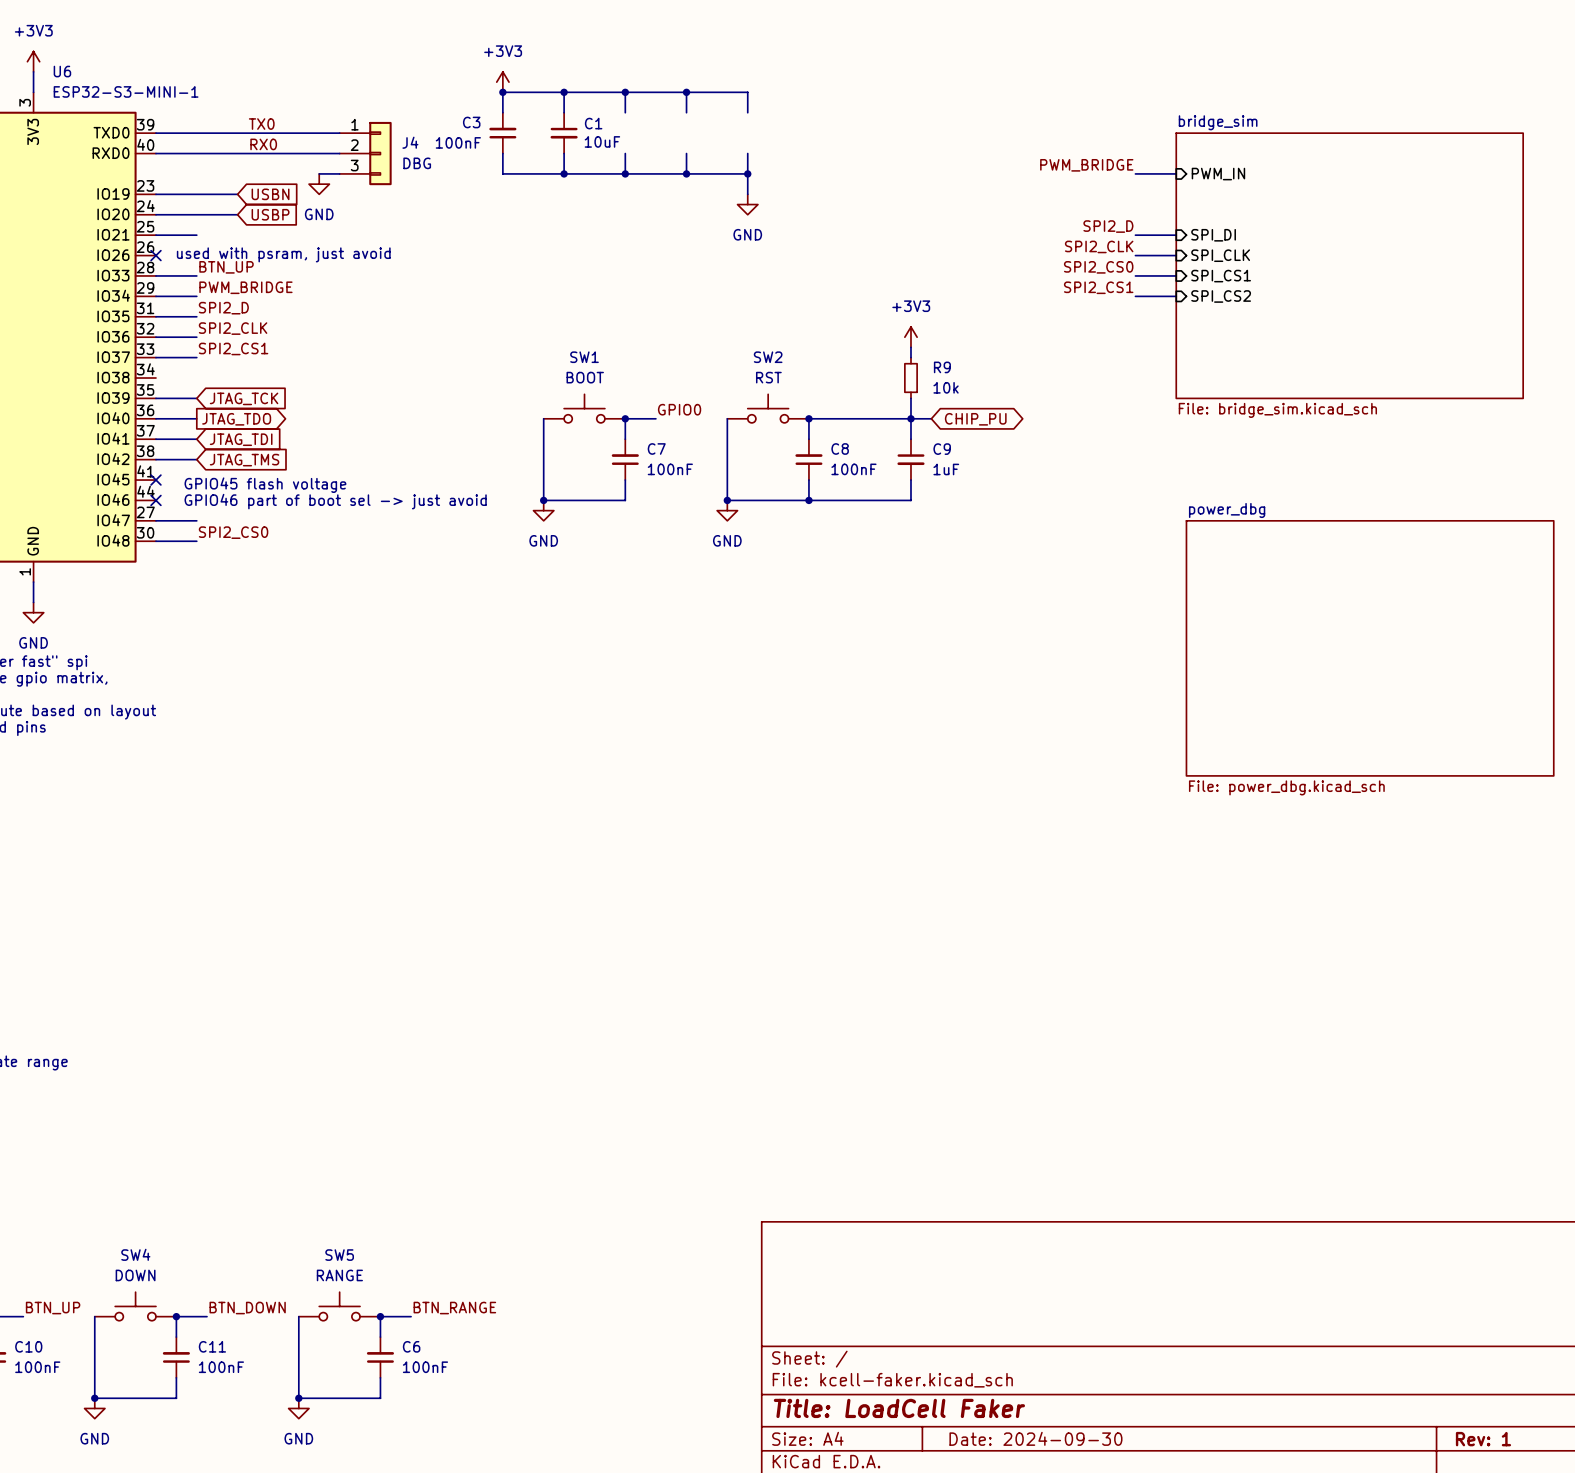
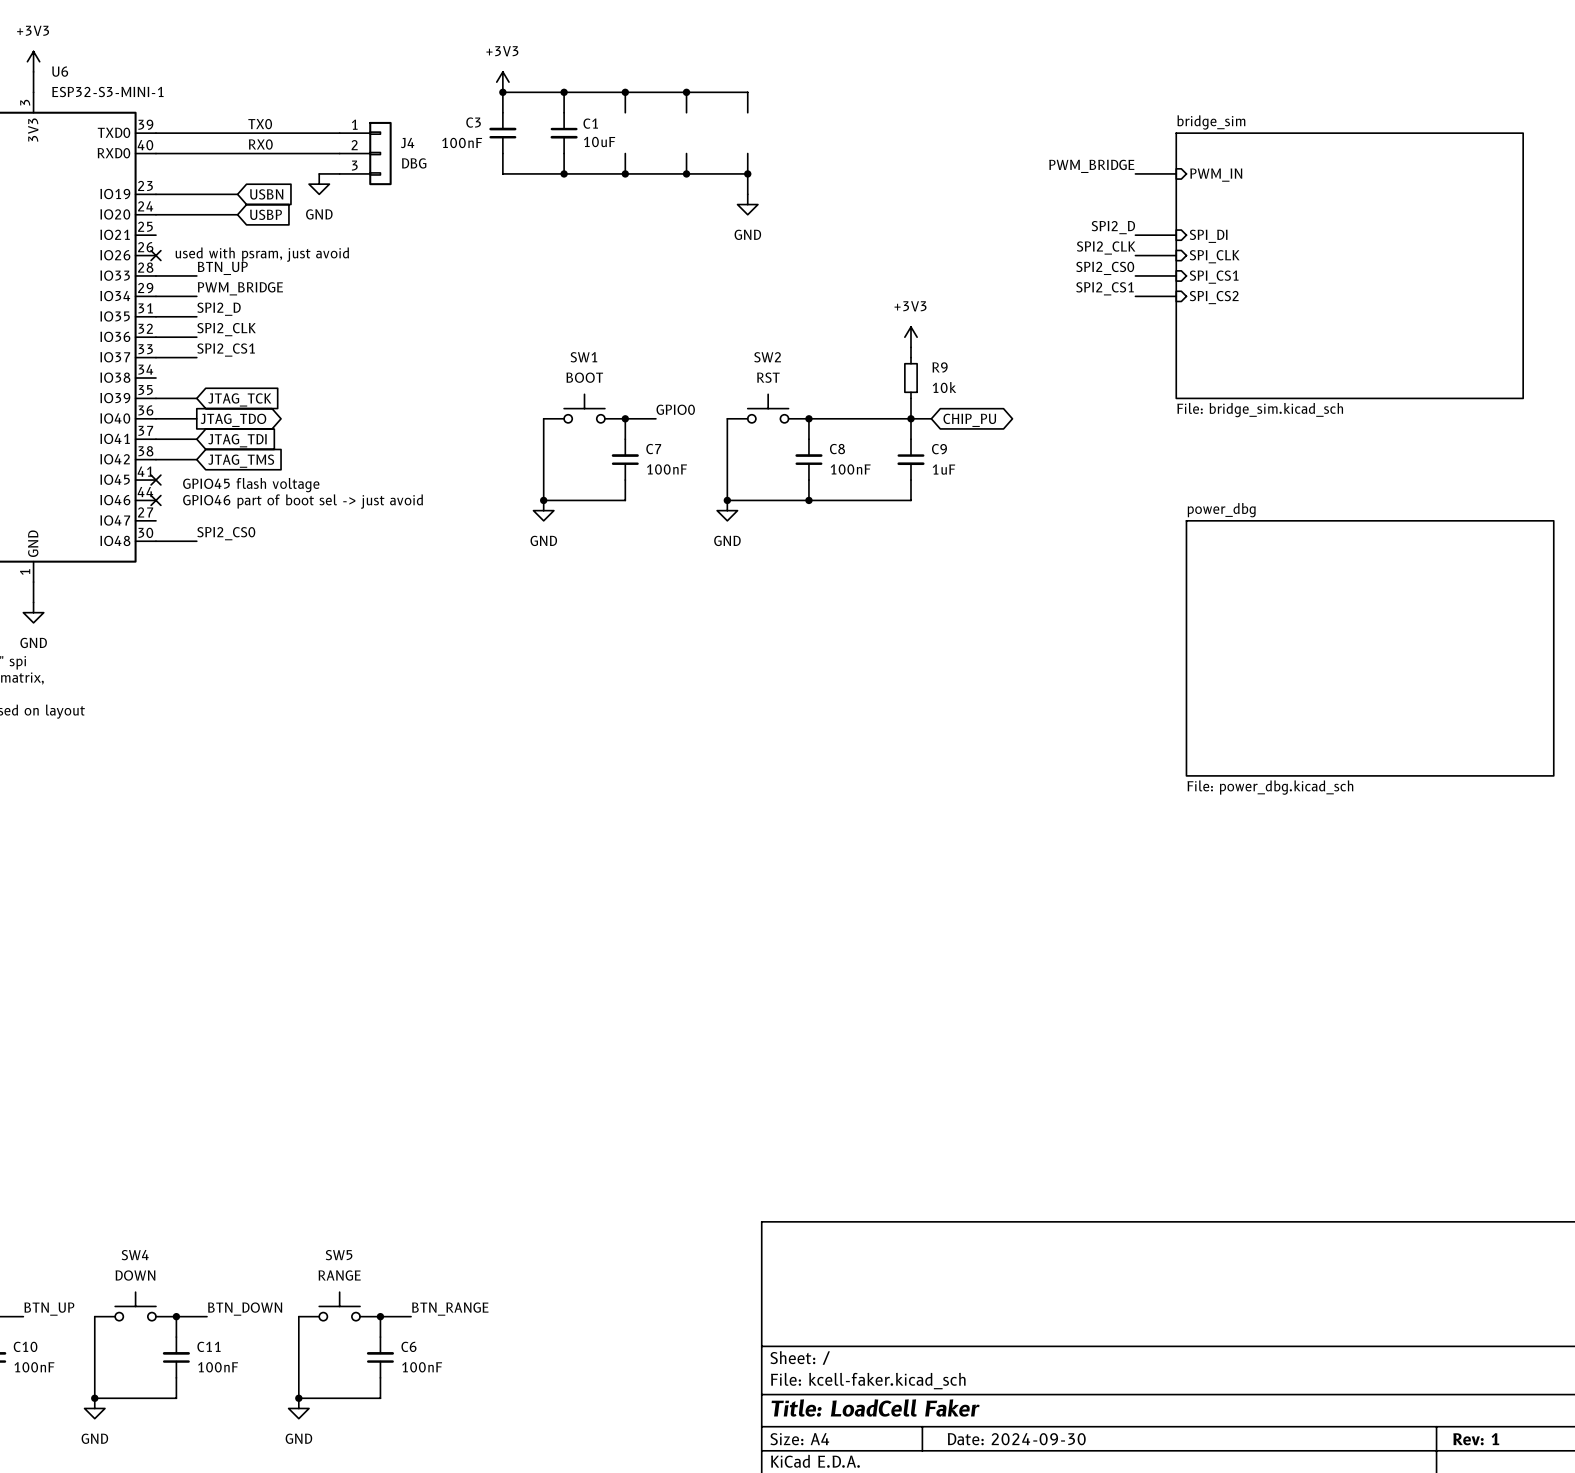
wire: (155, 235) (196, 235) -> none
wire: (155, 520) (196, 520) -> none

